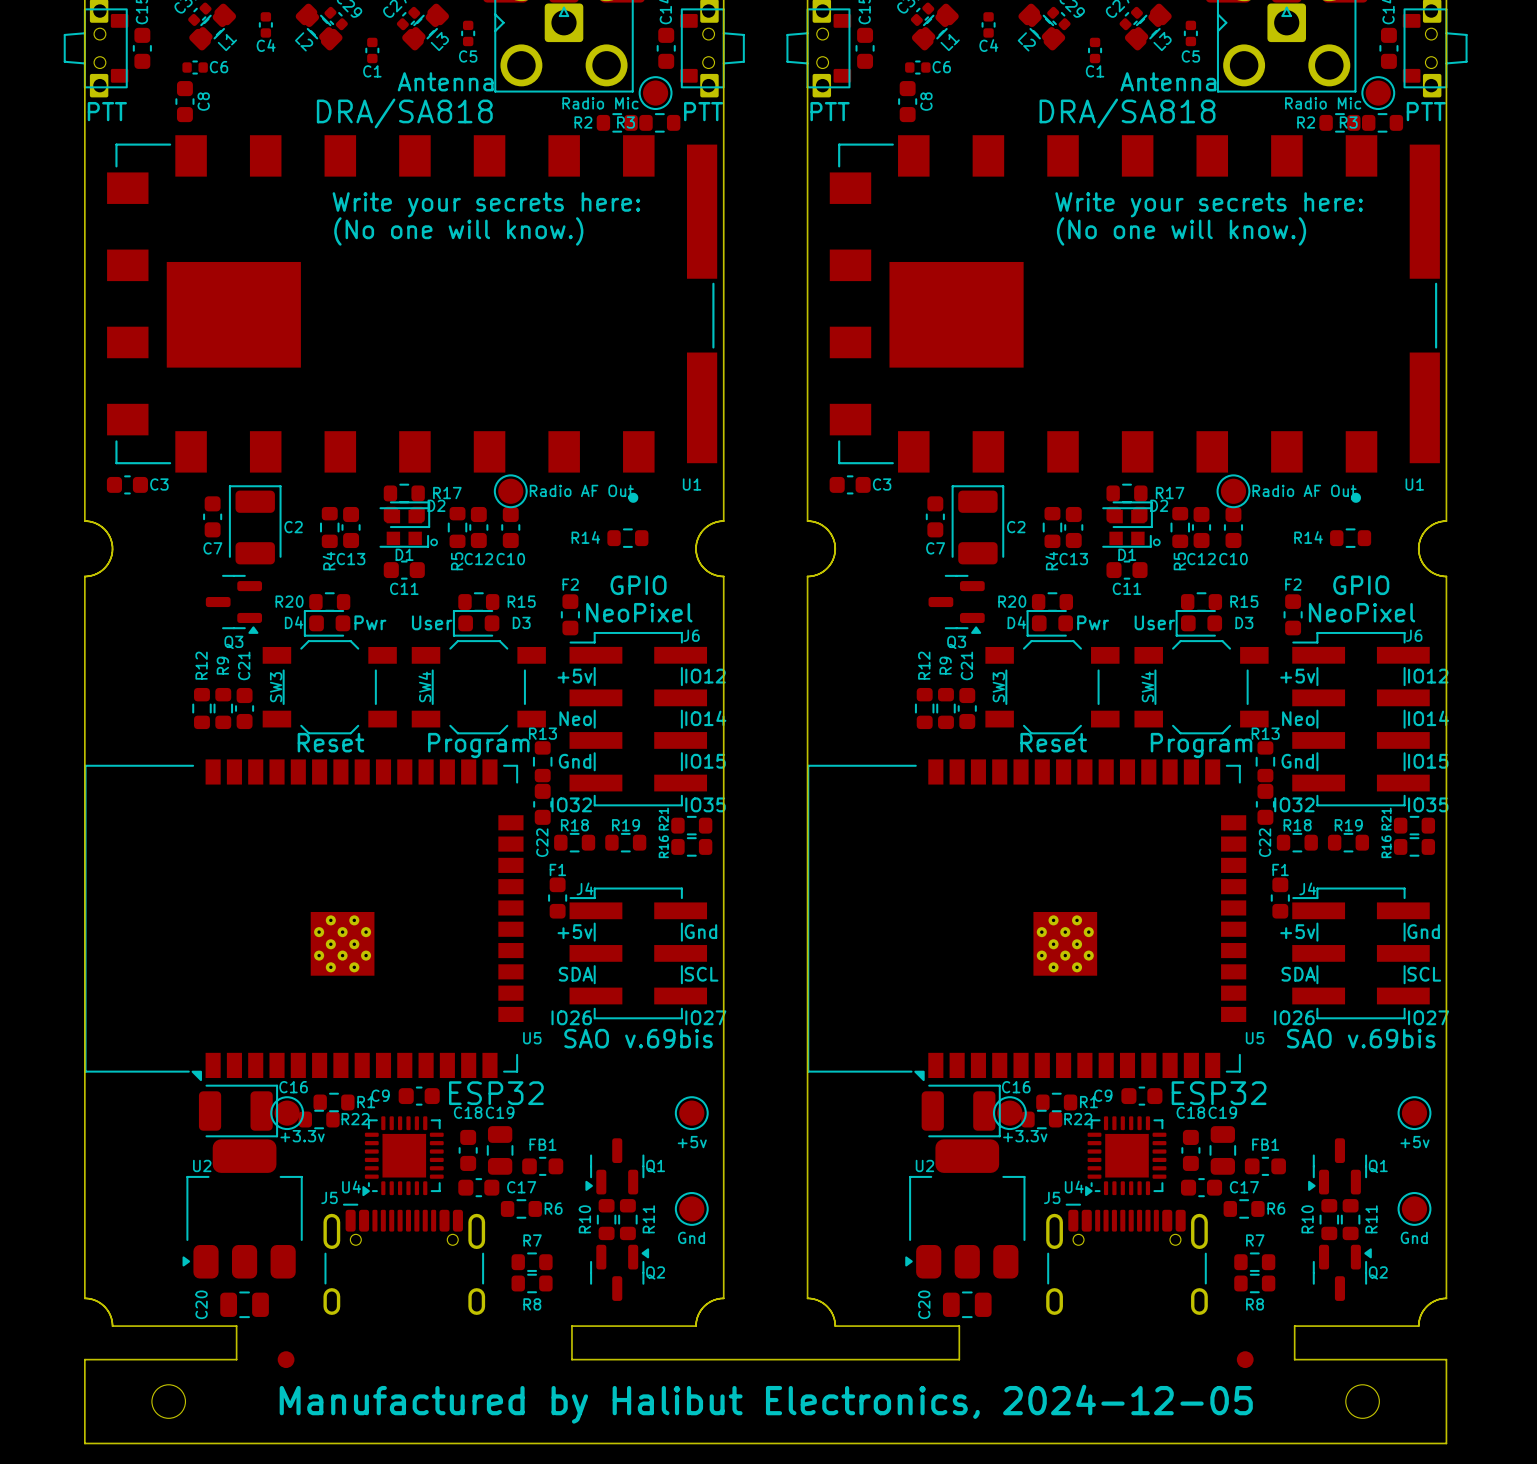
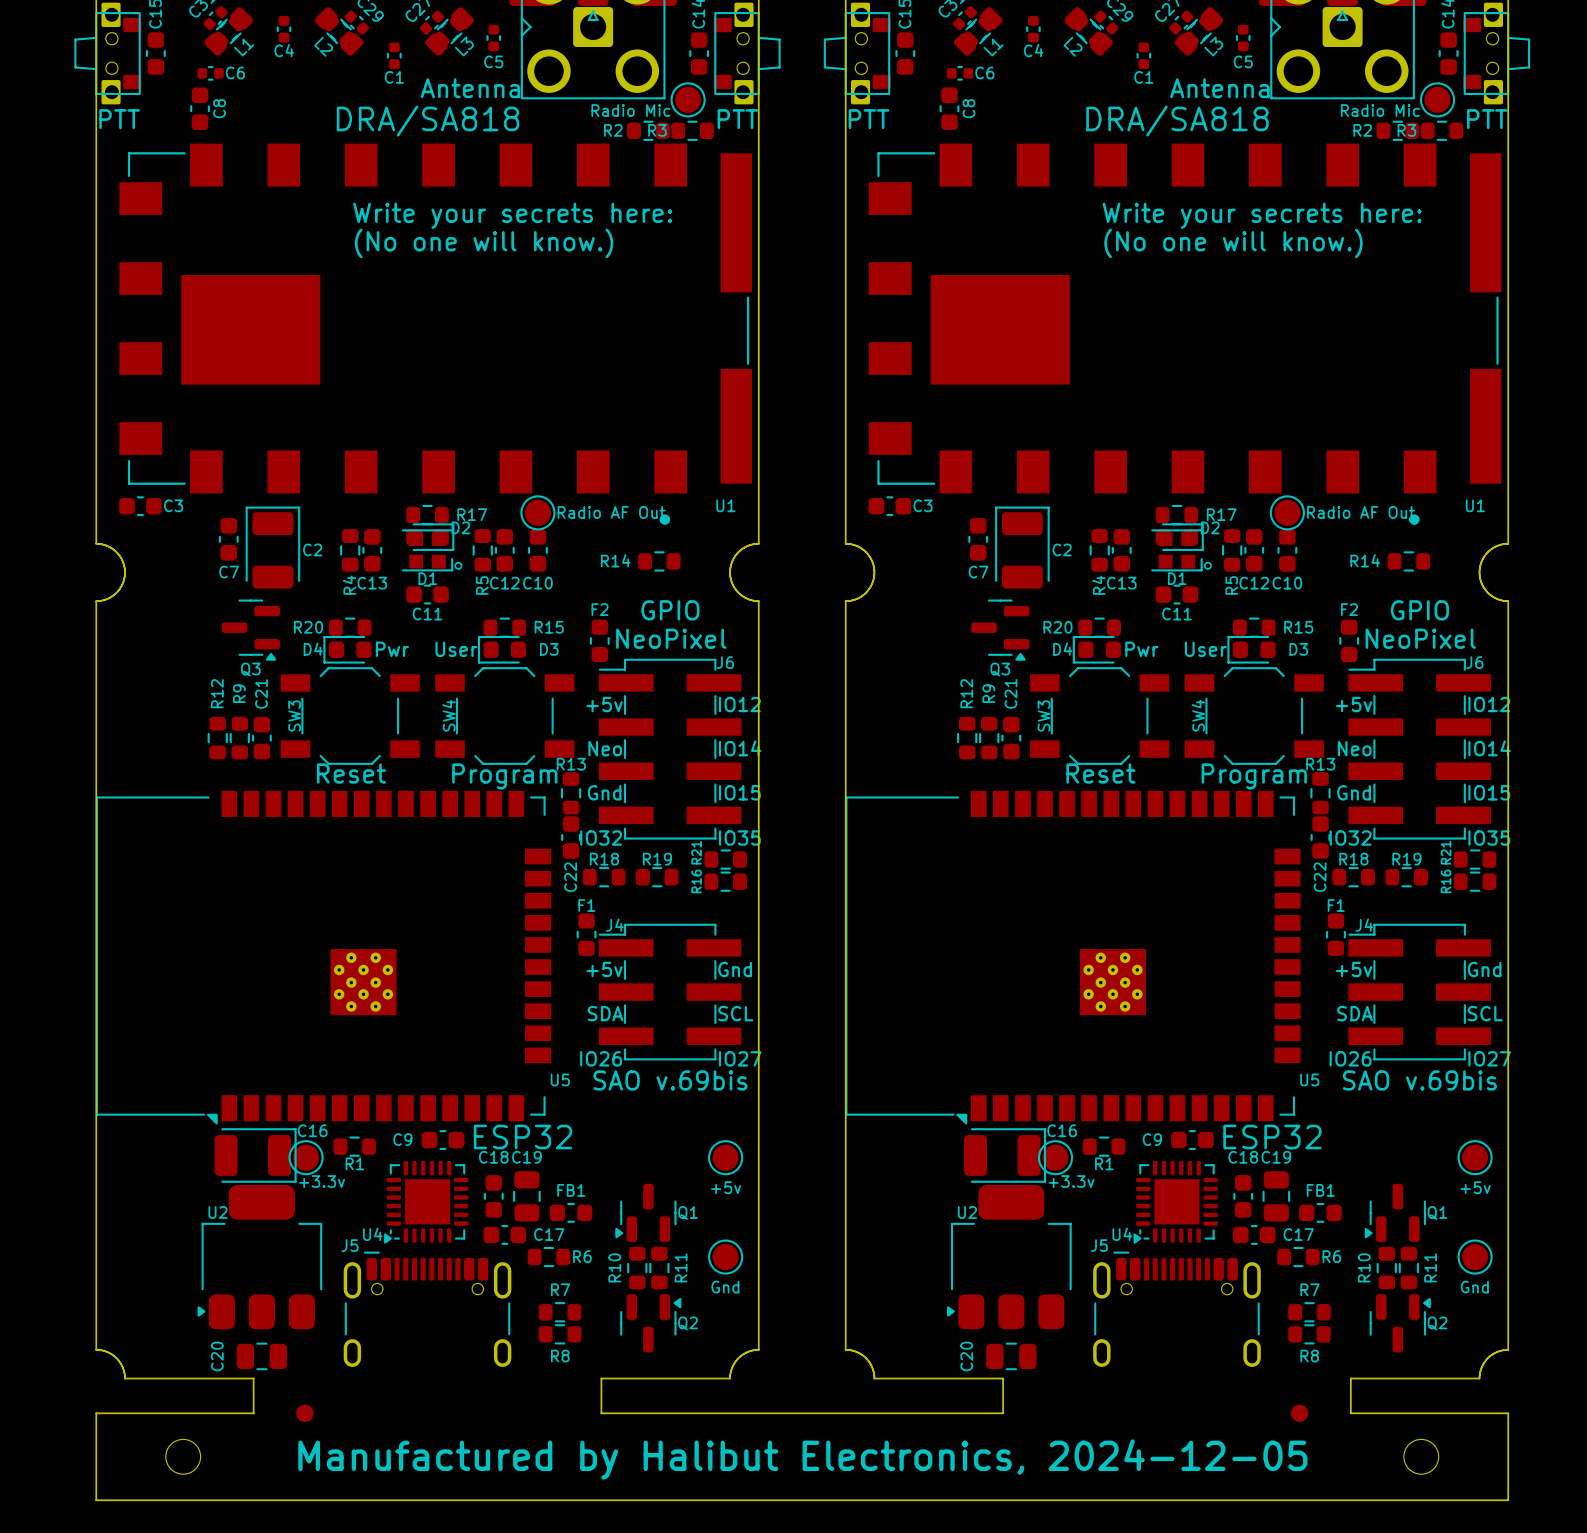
R1 name position: R1 (366, 1102) -> R1 (354, 1163)
R1 name position: R1 (1088, 1102) -> R1 (1104, 1163)
R22: (319, 1119) -> none
R22: (1041, 1119) -> none

